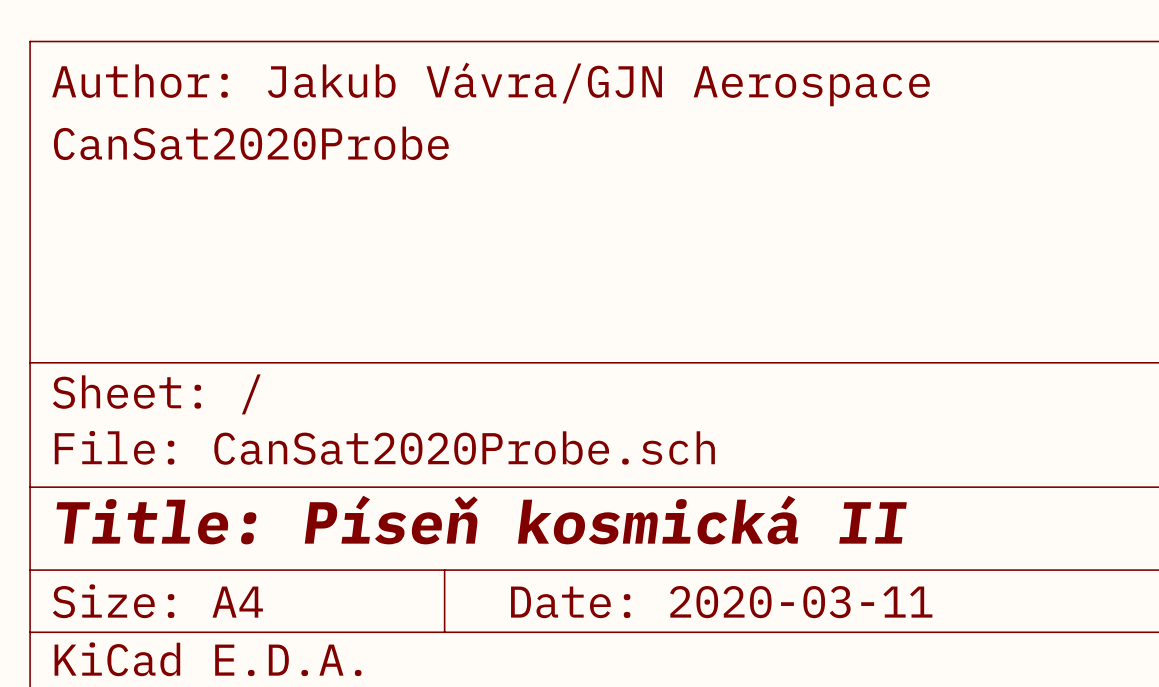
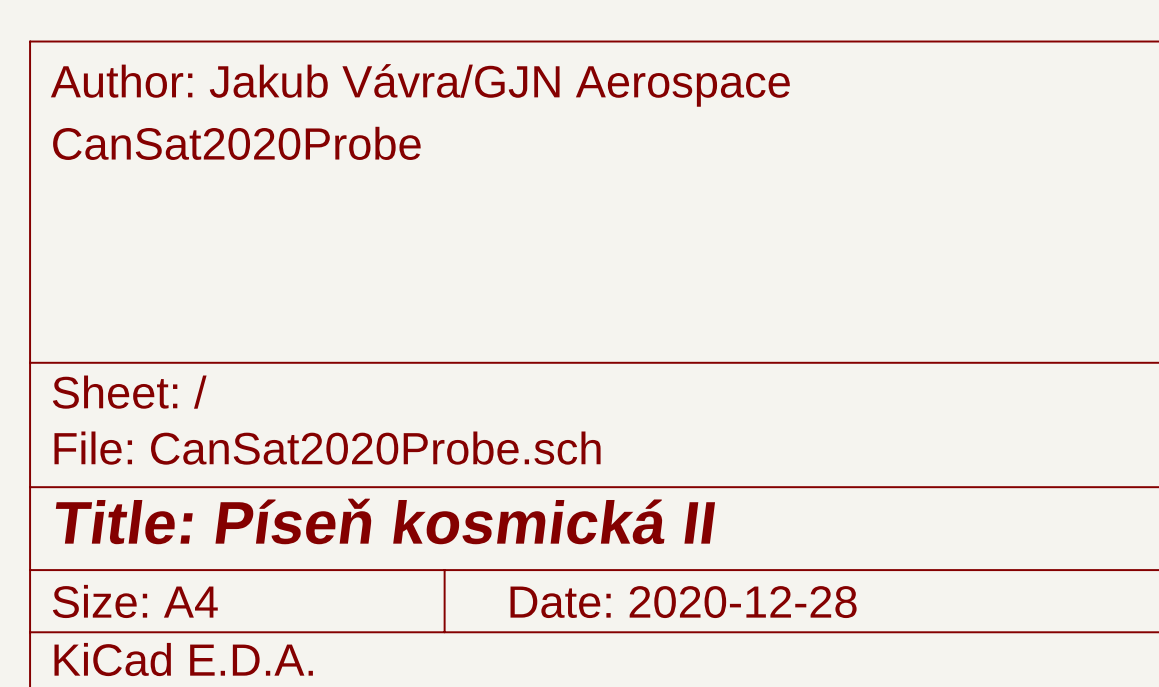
title block: Date: 2020-03-11 (721, 602) -> Date: 2020-12-28 (683, 602)

